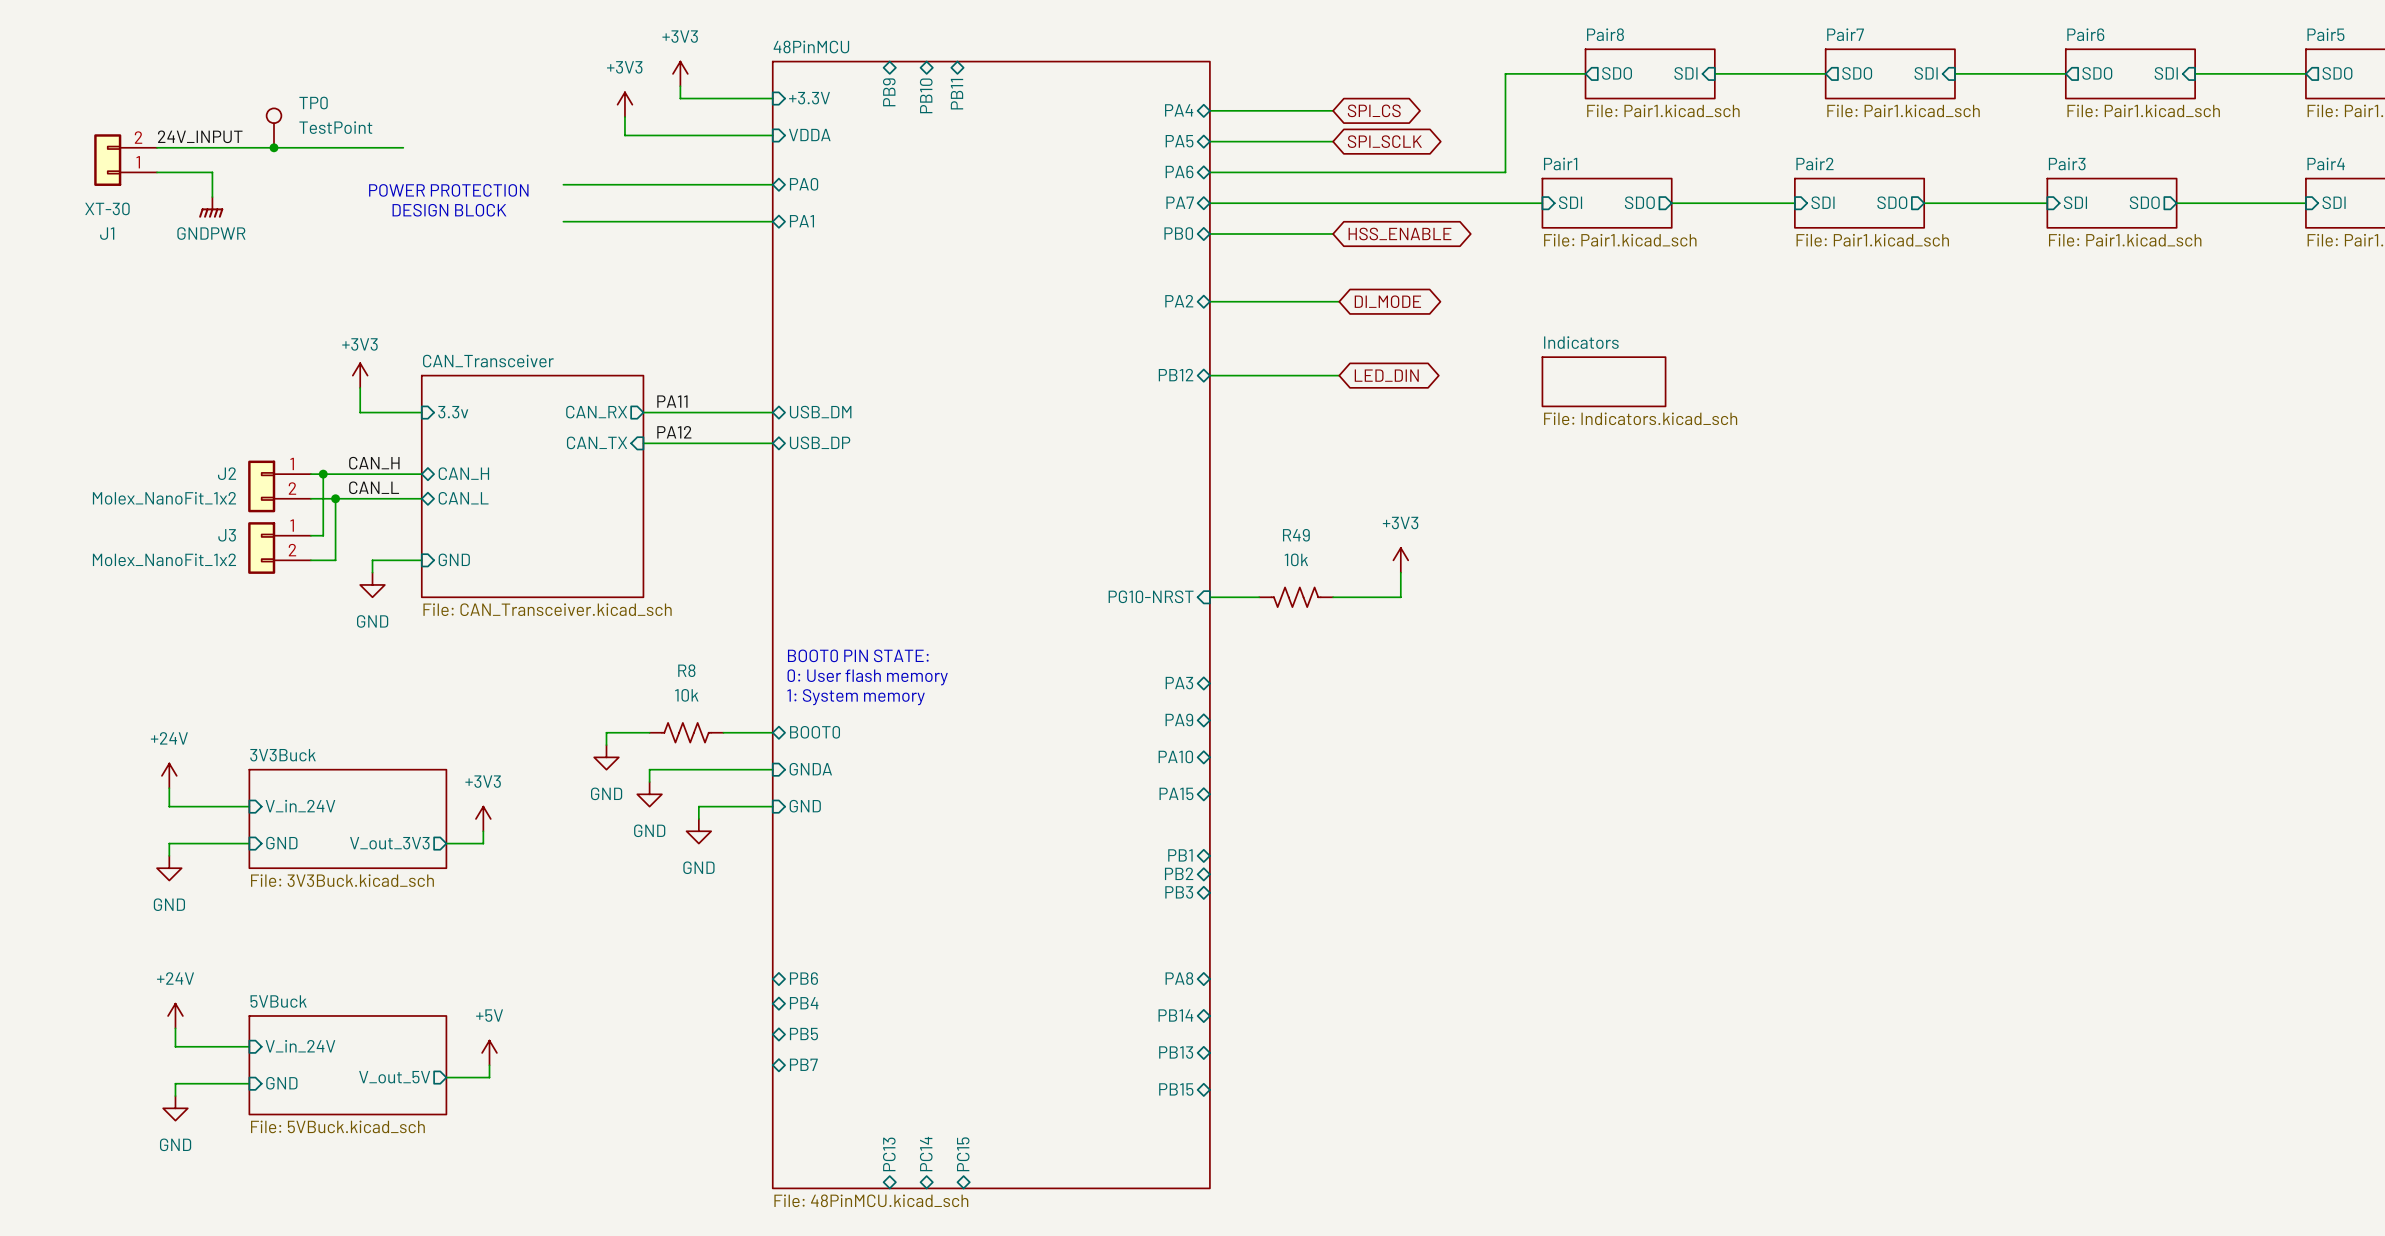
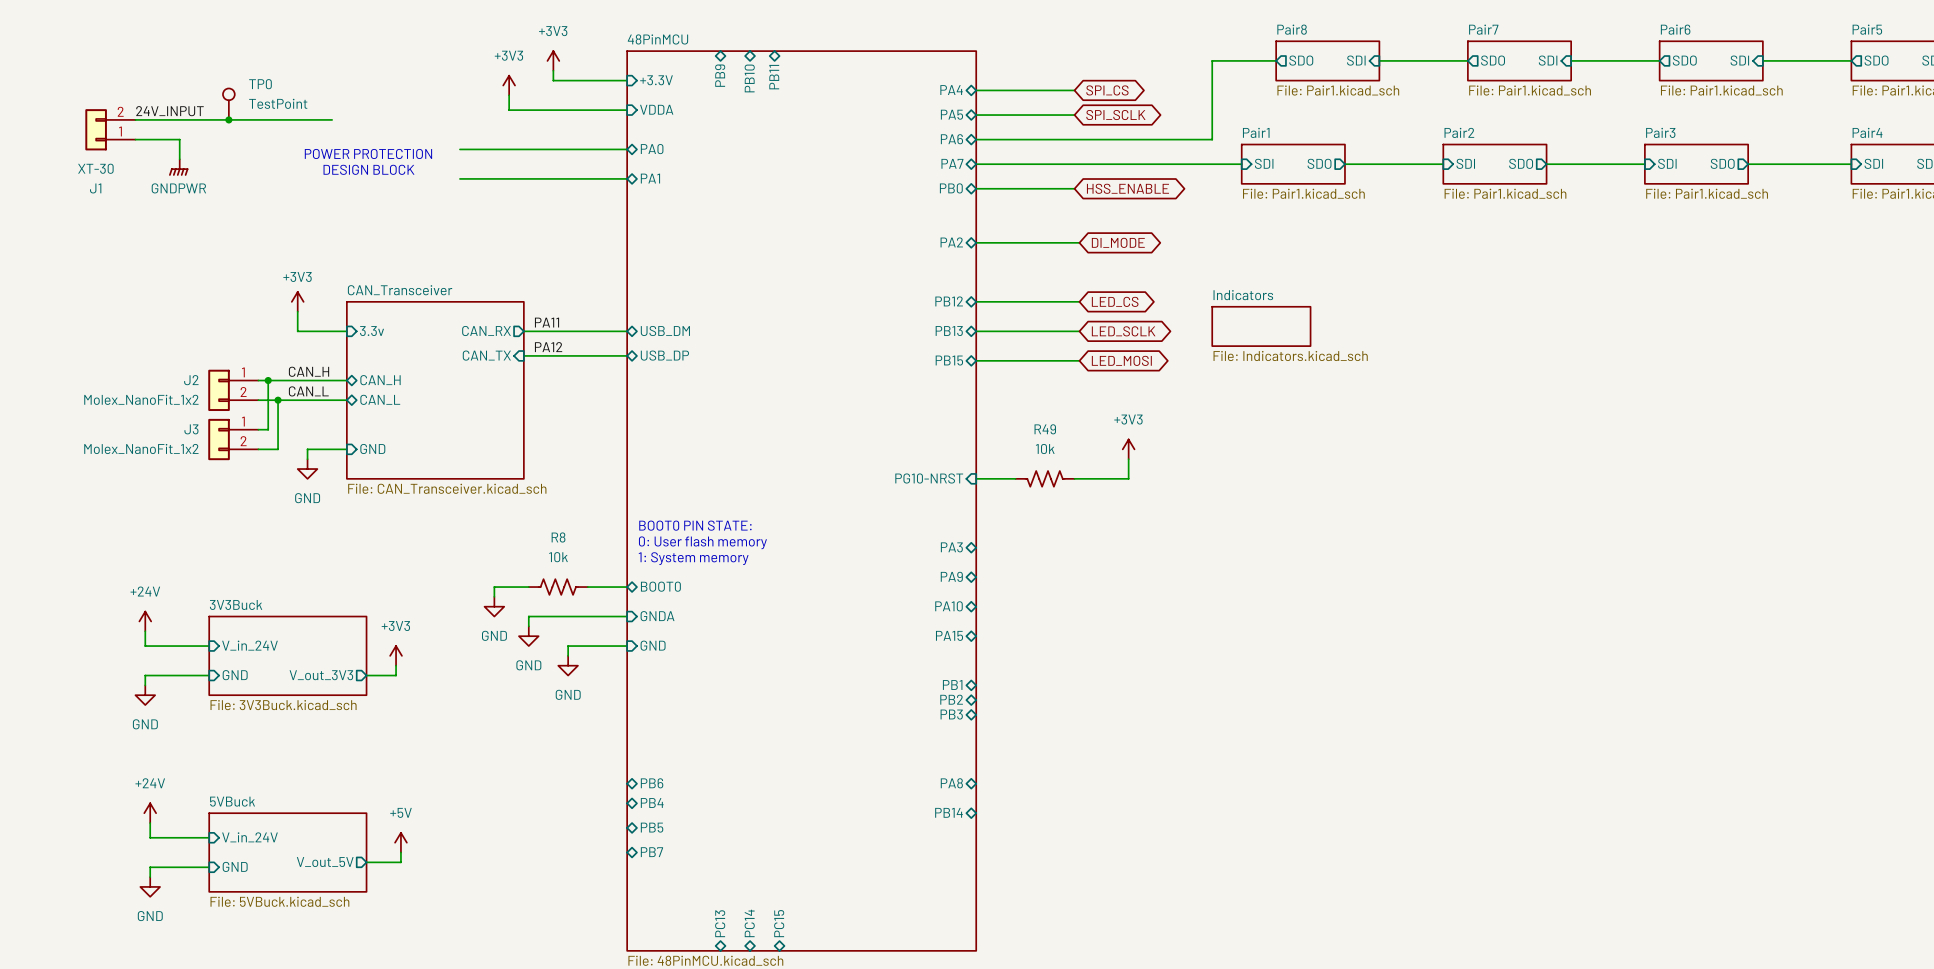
global label: LED_DIN (1386, 375) -> LED_CS (1115, 301)
sheet Indicators position: (1604, 381) -> (1261, 326)
sheet pin: none -> PB13 (949, 331)
wire: none -> (976, 331) (1079, 331)
global label: none -> LED_SCLK (1123, 331)
sheet pin: none -> PB15 (949, 360)
wire: none -> (976, 360) (1079, 360)
global label: none -> LED_MOSI (1121, 360)
sheet pin: PB13 (1176, 1052) -> none
sheet pin: PB15 (1176, 1089) -> none

